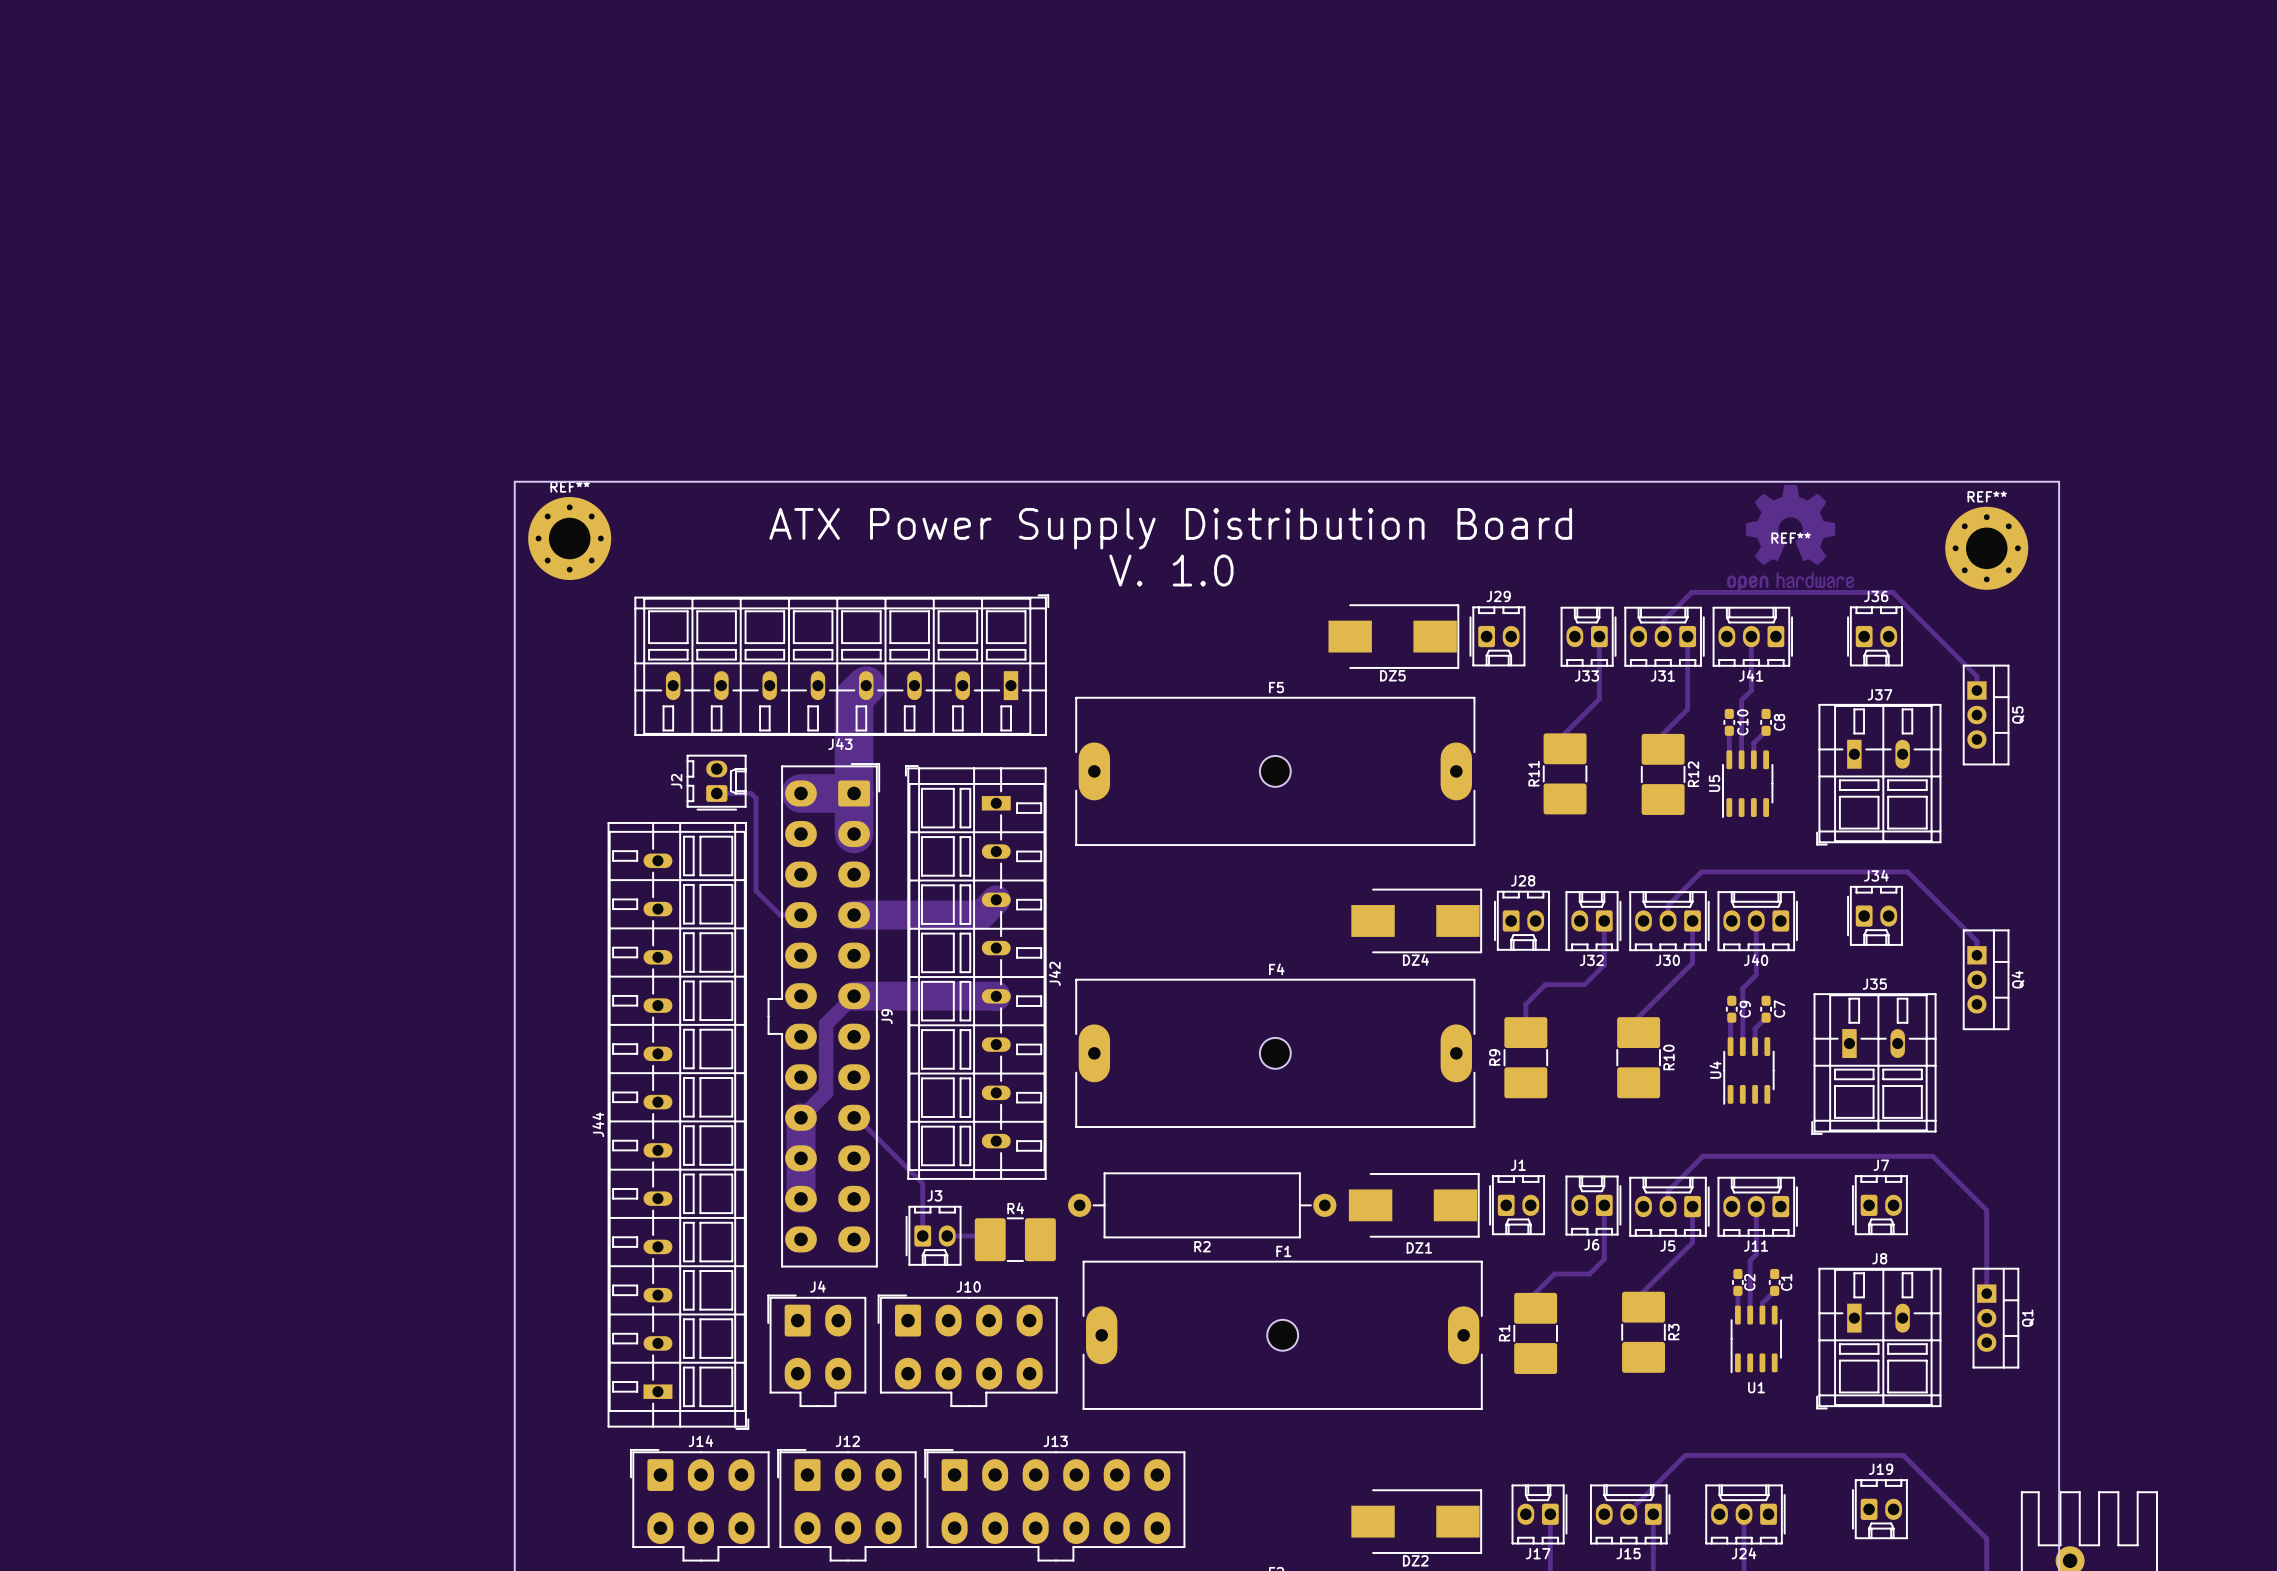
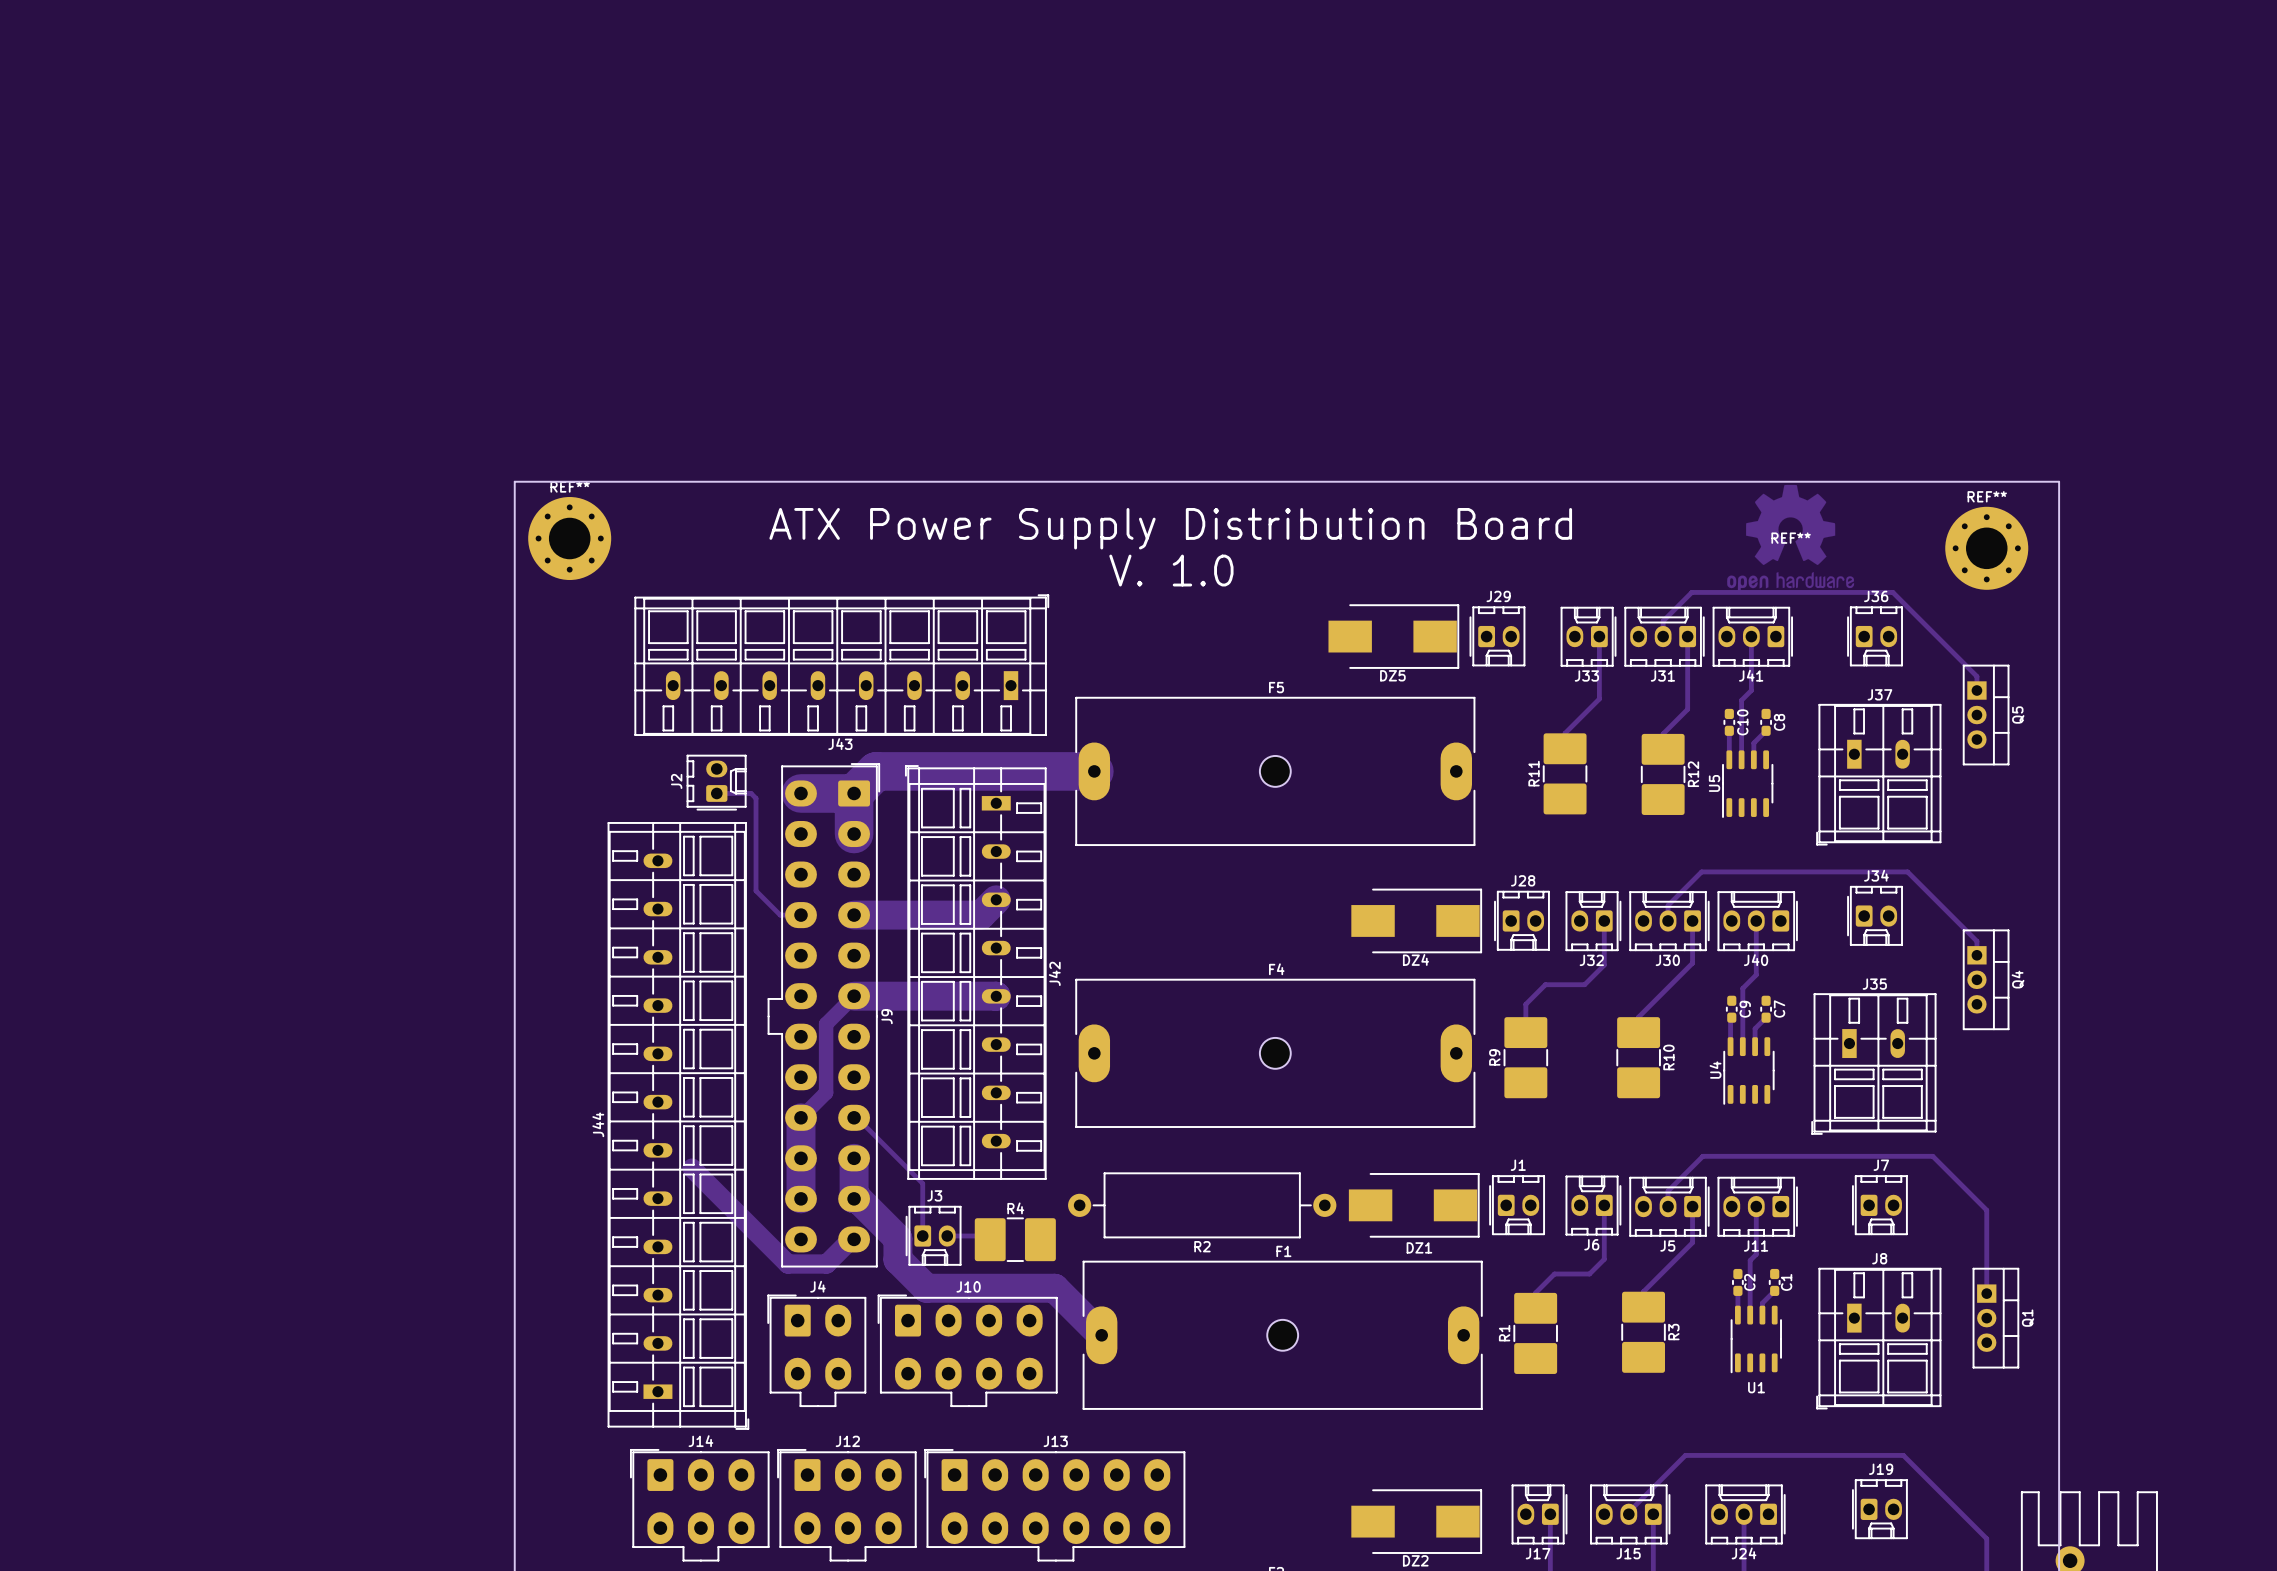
track: (866, 685) (854, 697) (854, 793) -> (1094, 771) (876, 771) (854, 793)
track: none -> (854, 1158) (854, 1198) (858, 1198) (897, 1238) (897, 1259) (926, 1288) (1054, 1288) (1101, 1335)
track: none -> (691, 1168) (787, 1264) (826, 1264) (851, 1239) (854, 1239)

